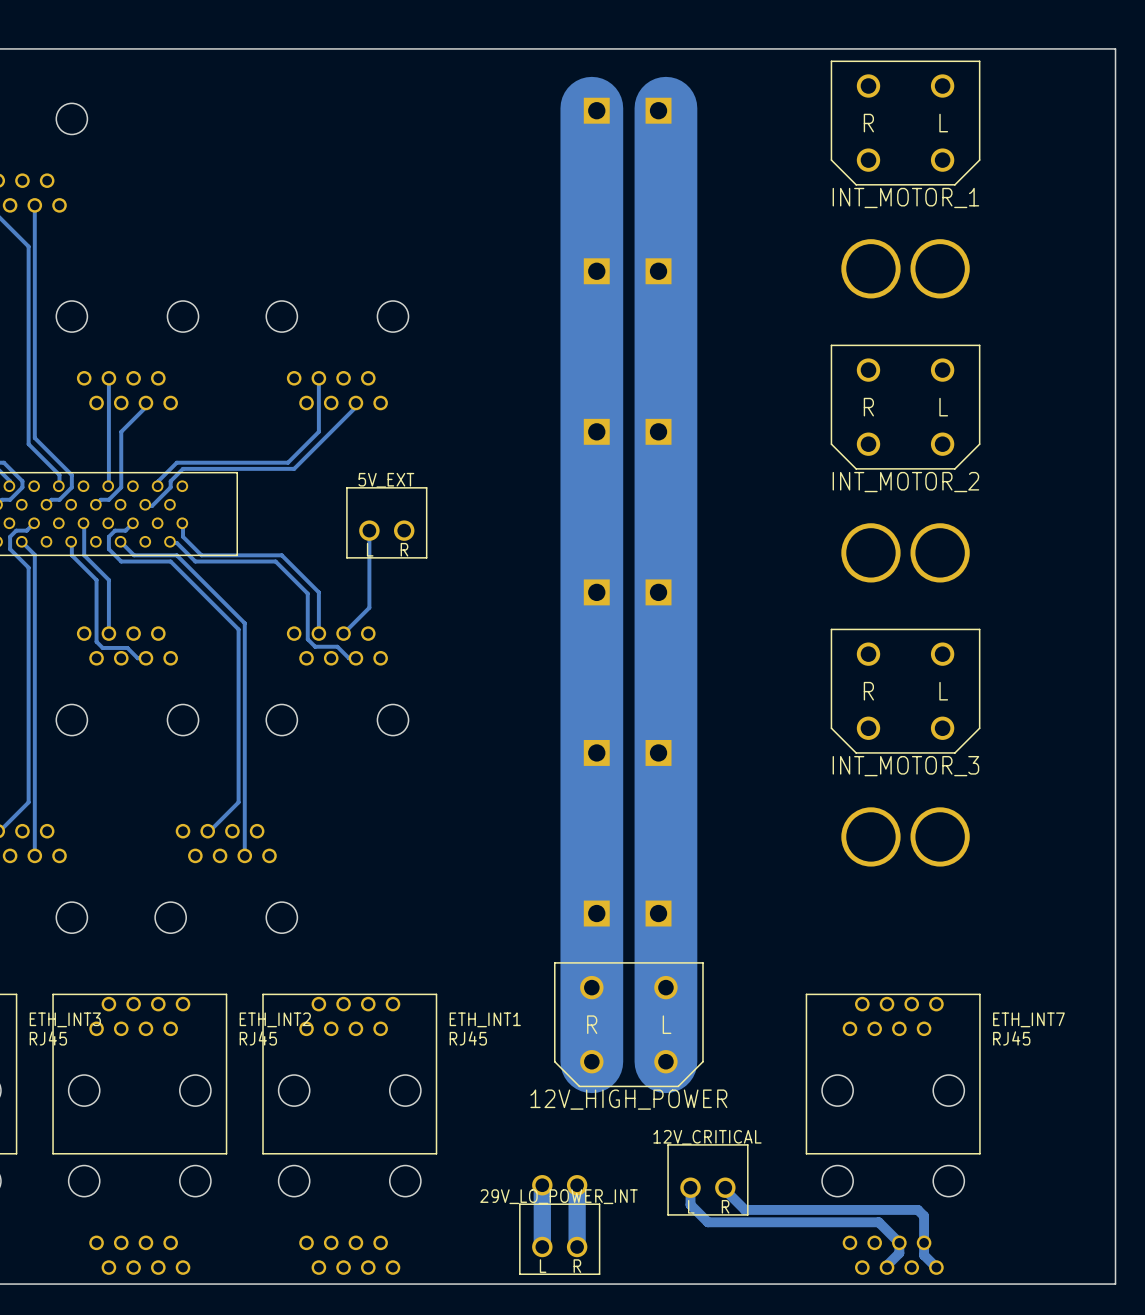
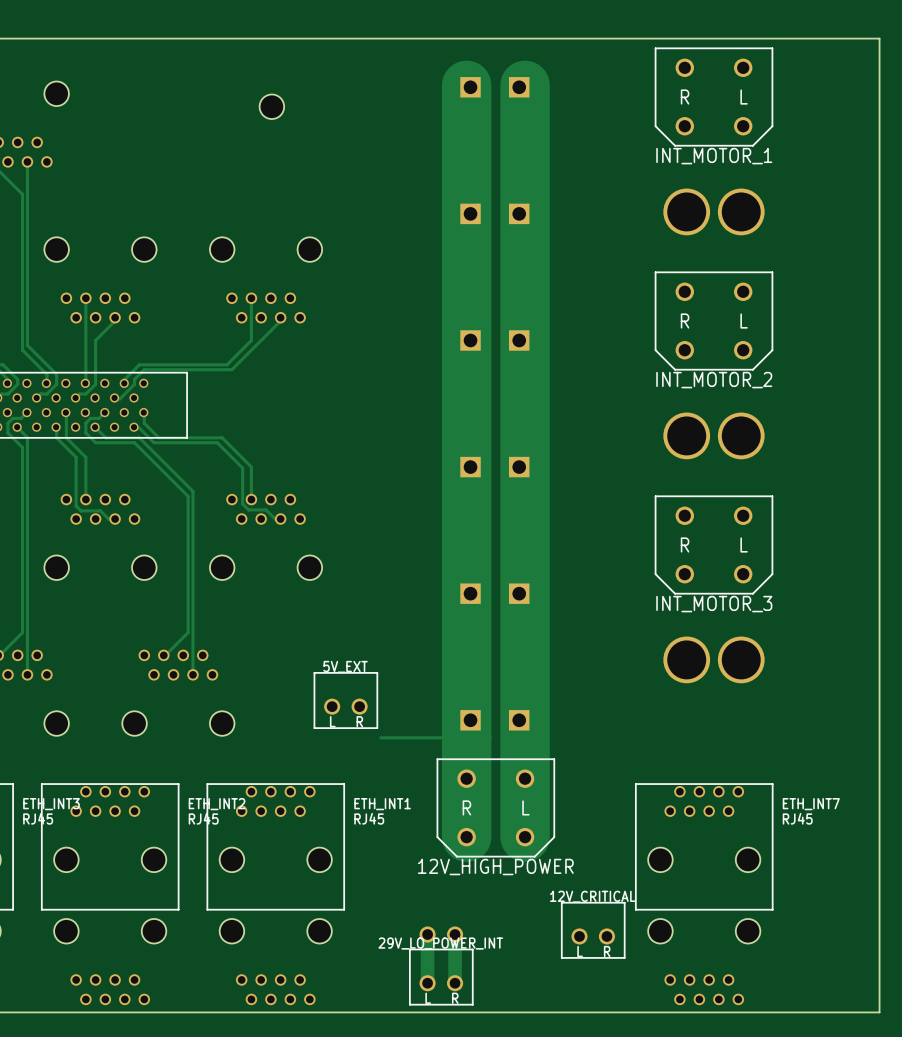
part: none -> (271, 106)
5V_EXT position: (386, 522) -> (345, 700)
track: (369, 530) (369, 607) (343, 633) -> none
track: none -> (466, 737) (380, 737)
12V_CRITICAL position: (707, 1179) -> (593, 930)
track: (690, 1187) (690, 1204) (707, 1222) (878, 1222) (899, 1242) (899, 1253) (887, 1267) -> none
track: (725, 1187) (725, 1190) (744, 1209) (917, 1209) (924, 1216) (924, 1255) (936, 1267) -> none

